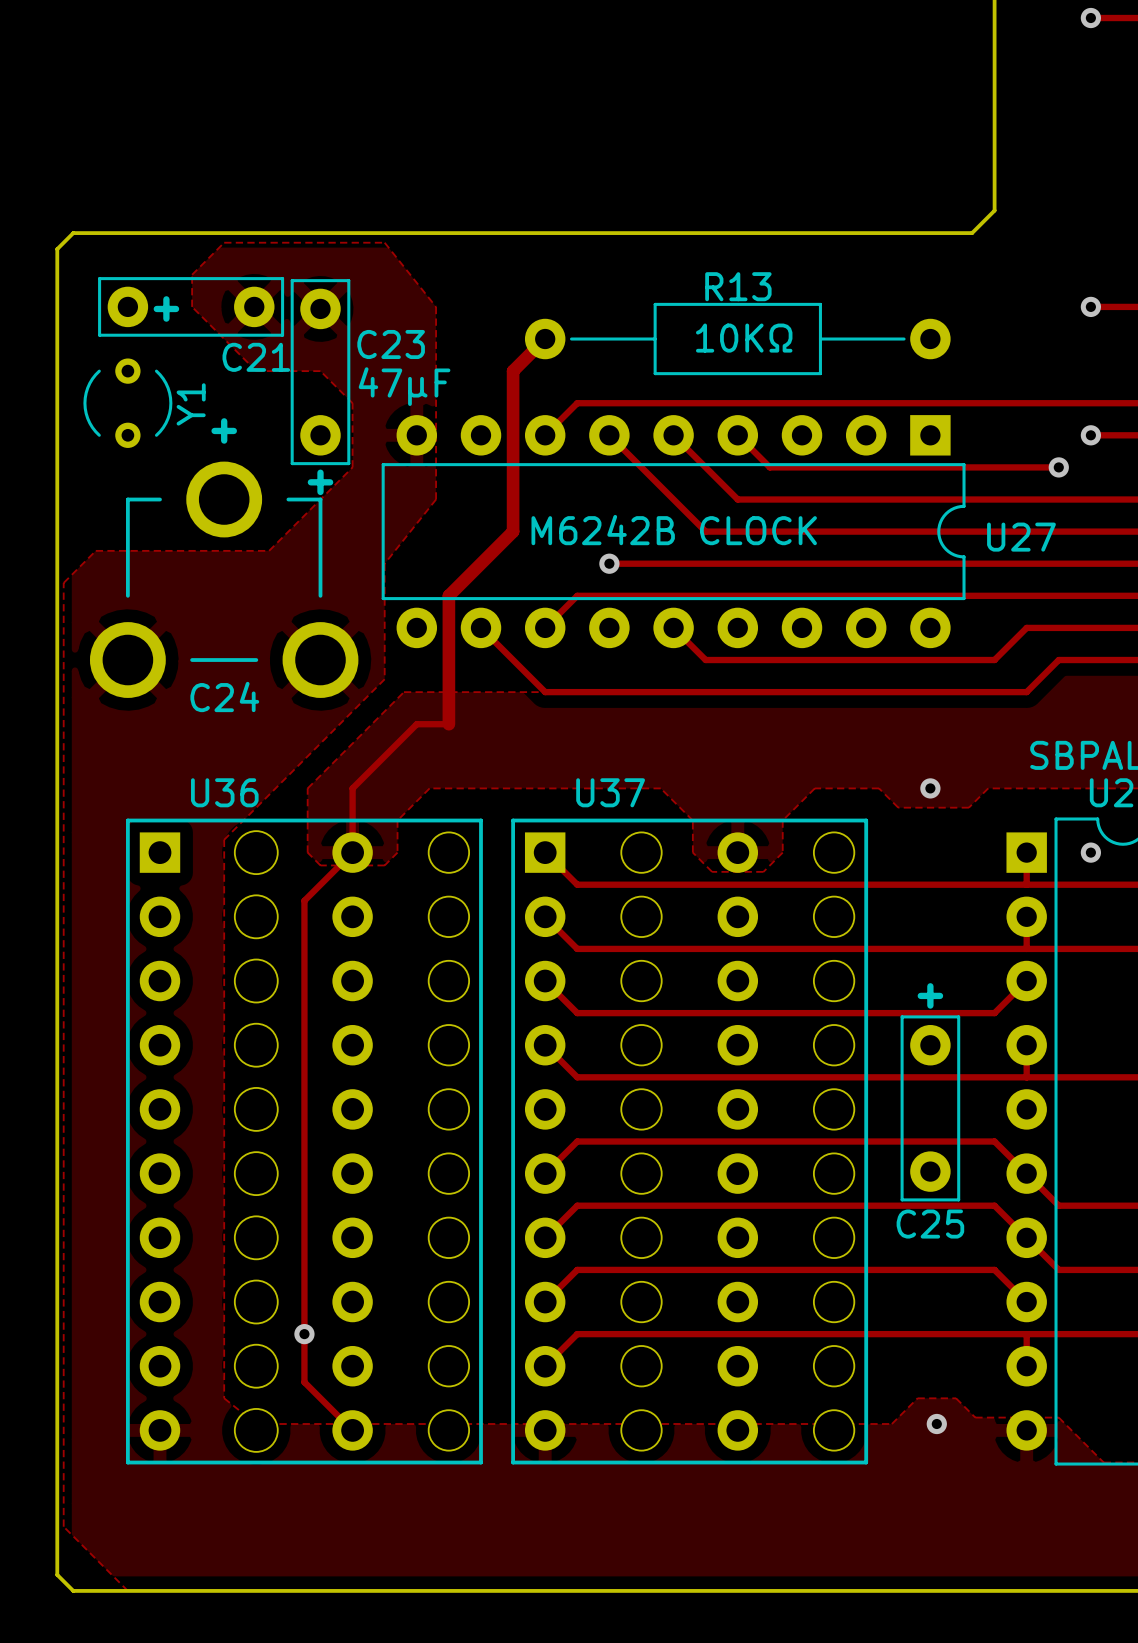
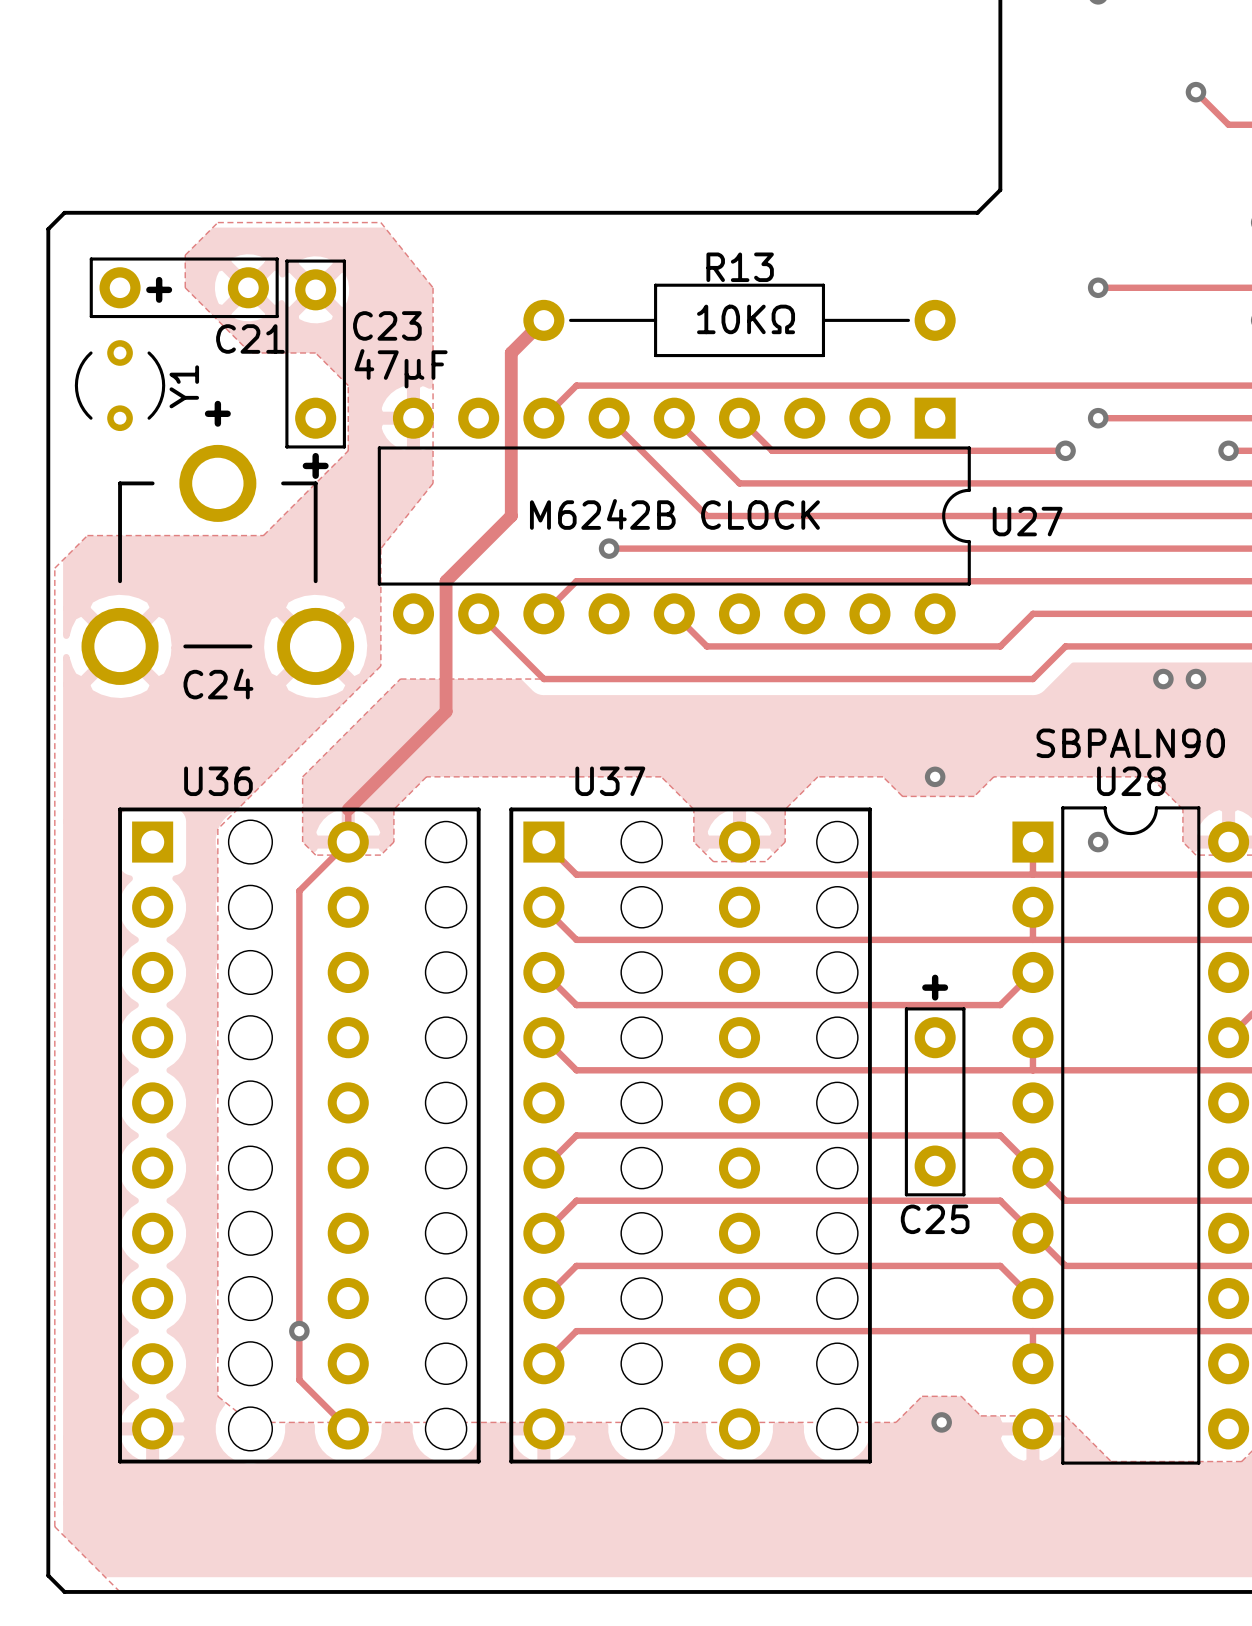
track: (448, 724) (416, 724) (352, 788) (352, 820) -> (446, 711) (348, 809)

